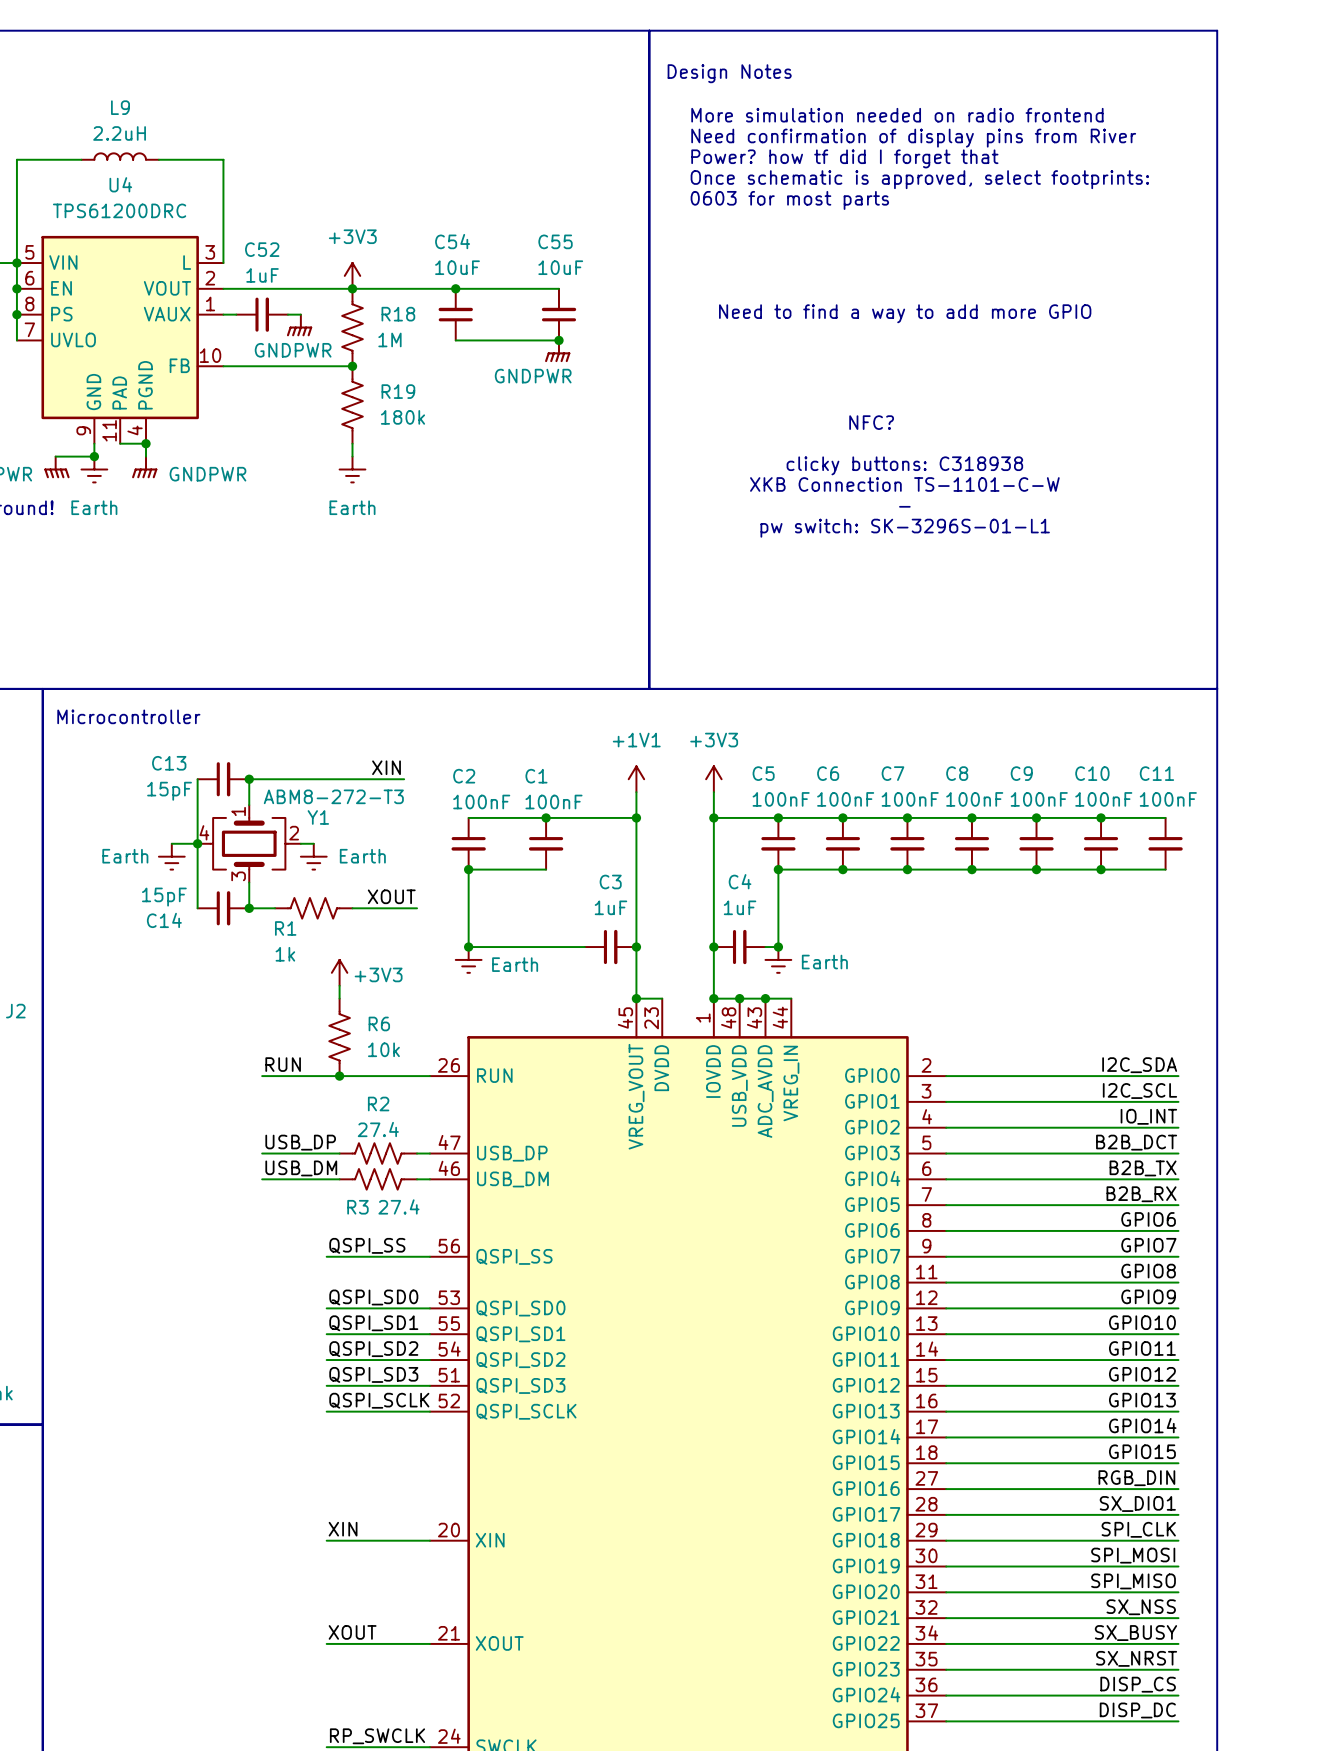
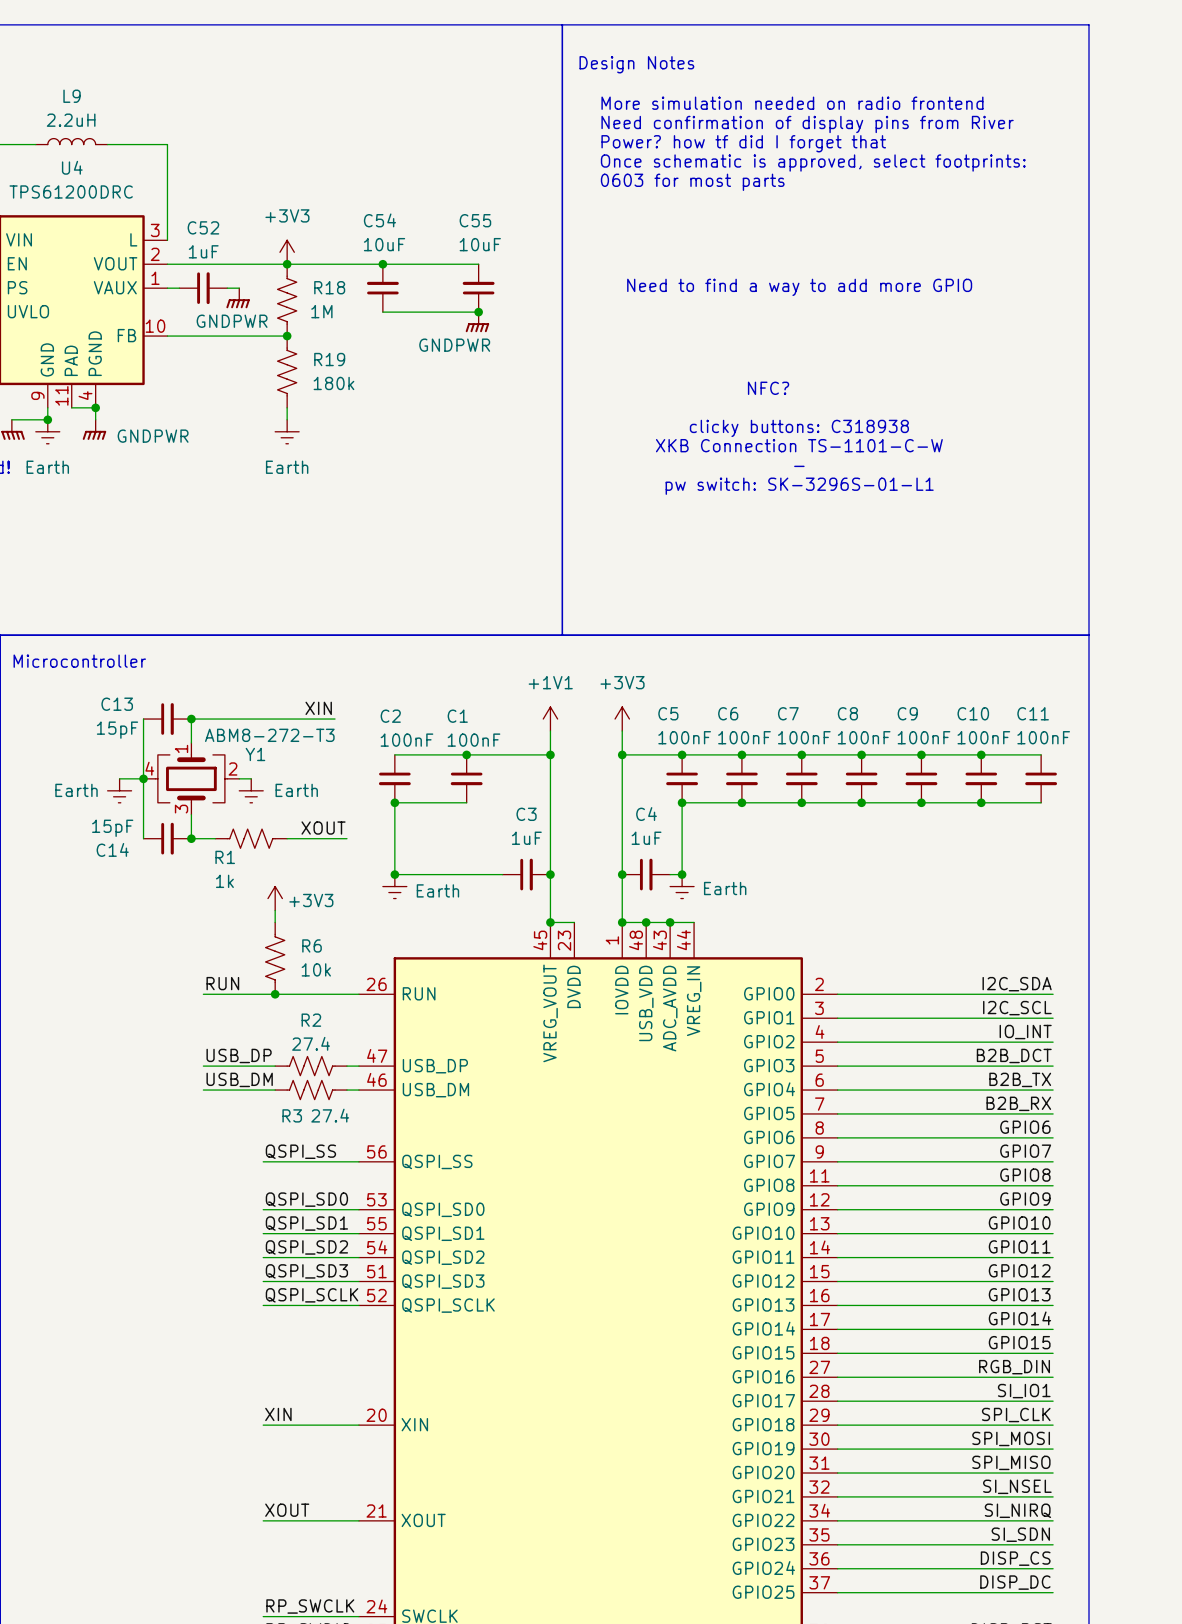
label: SX_DIO1 (1137, 1503) -> SI_IO1 (1024, 1391)
label: SX_NSS (1141, 1607) -> SI_NSEL (1017, 1486)
label: SX_BUSY (1135, 1633) -> SI_NIRQ (1017, 1510)
label: SX_NRST (1136, 1658) -> SI_SDN (1020, 1534)

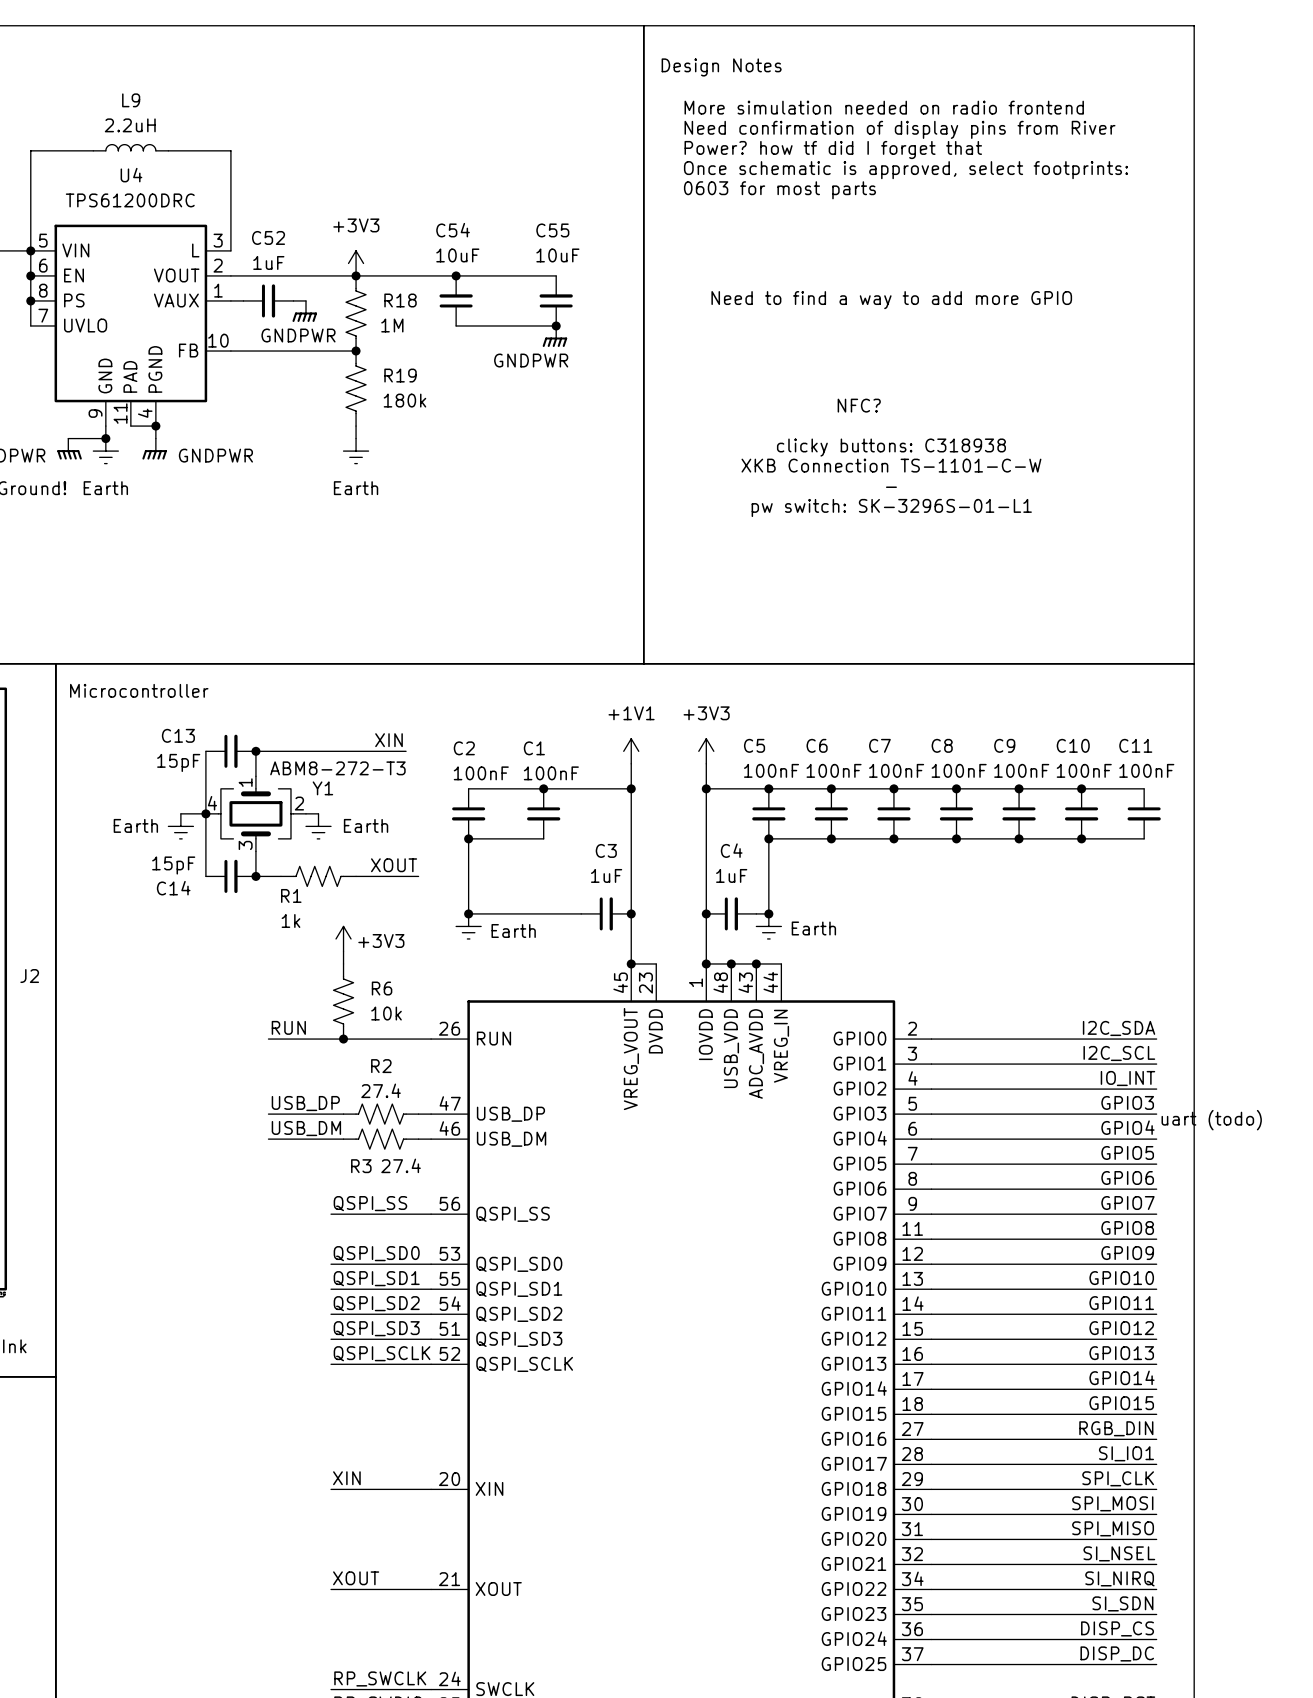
label: B2B_DCT (1014, 1055) -> GPIO3 (1127, 1102)
text: none -> uart (todo) (1211, 1120)
label: B2B_TX (1020, 1079) -> GPIO4 (1127, 1127)
label: B2B_RX (1018, 1103) -> GPIO5 (1127, 1152)

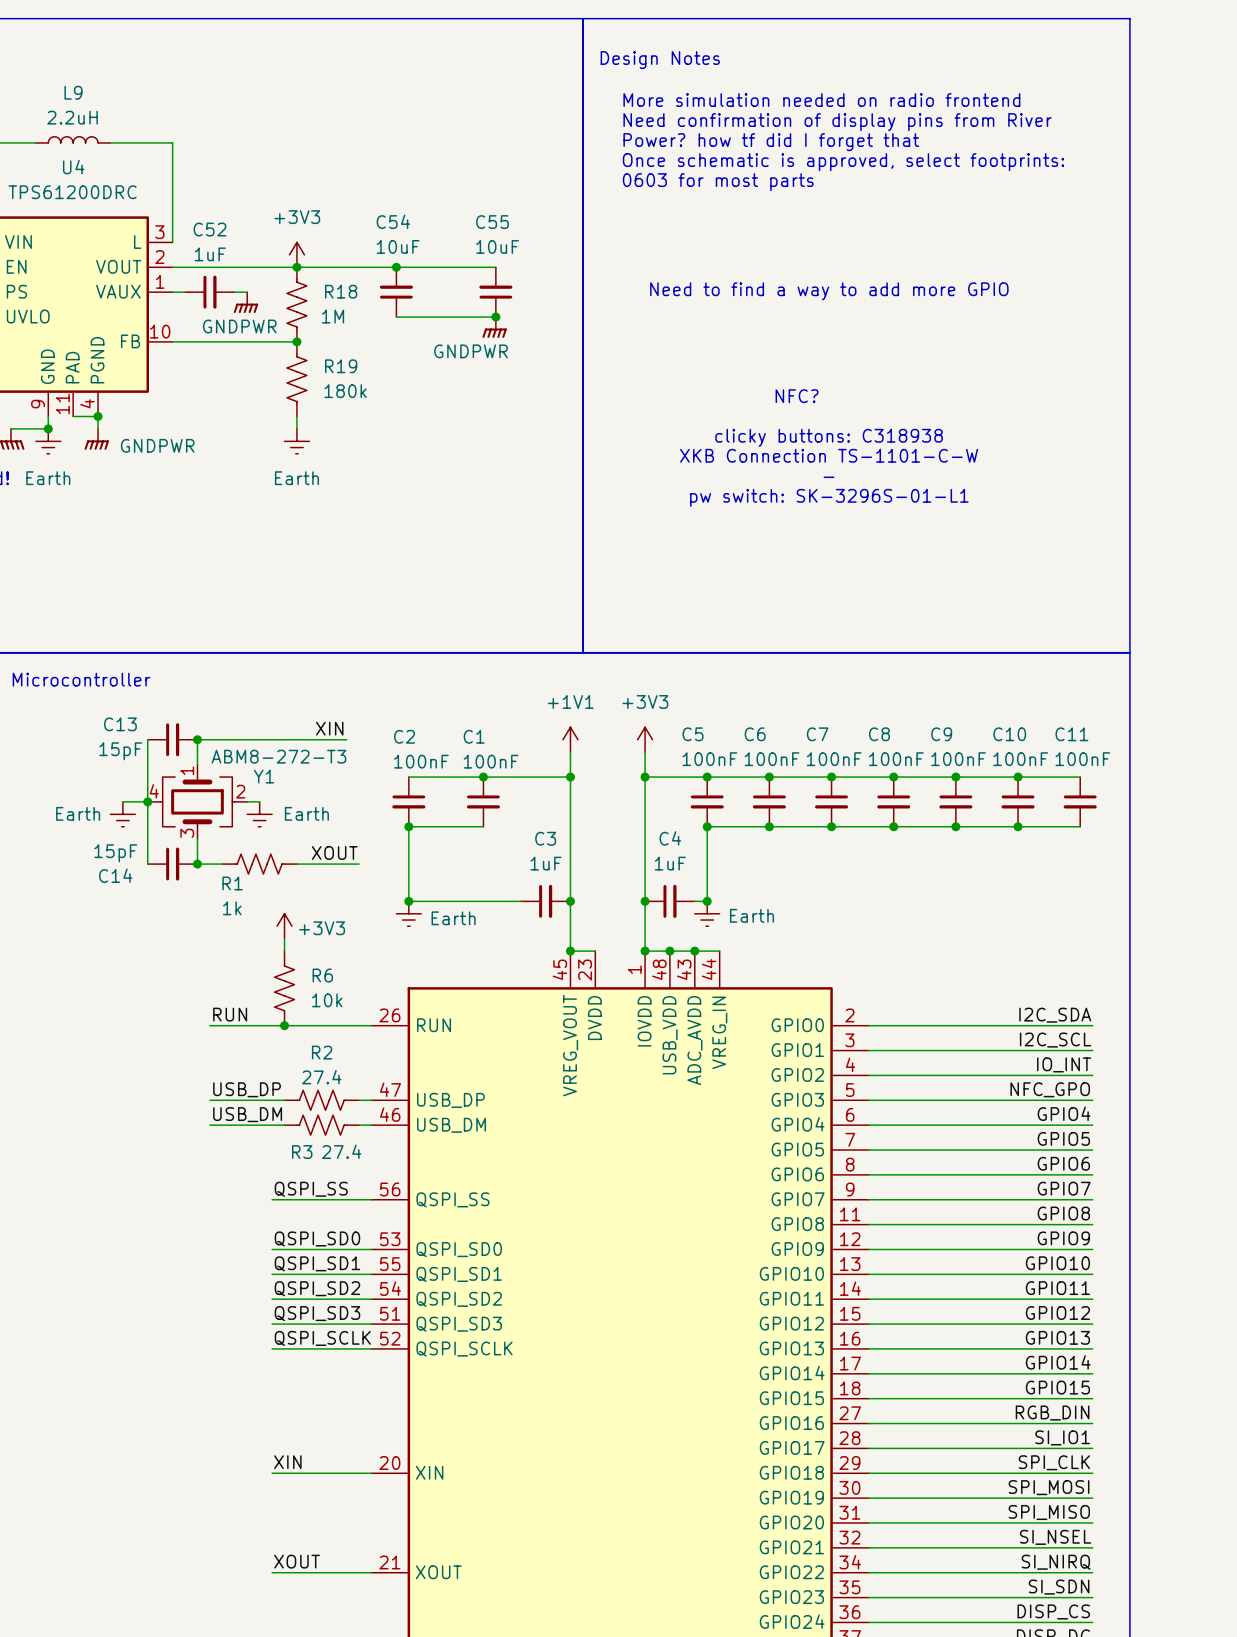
label: GPIO3 (1127, 1102) -> NFC_GPO (1050, 1089)
text: uart (todo) (1211, 1120) -> none

